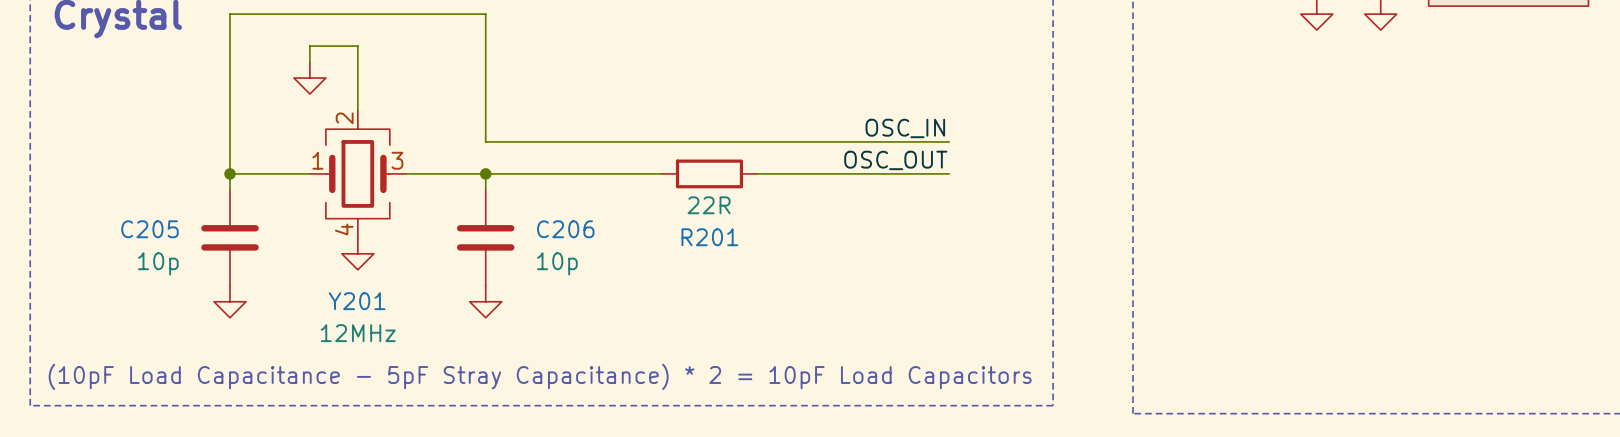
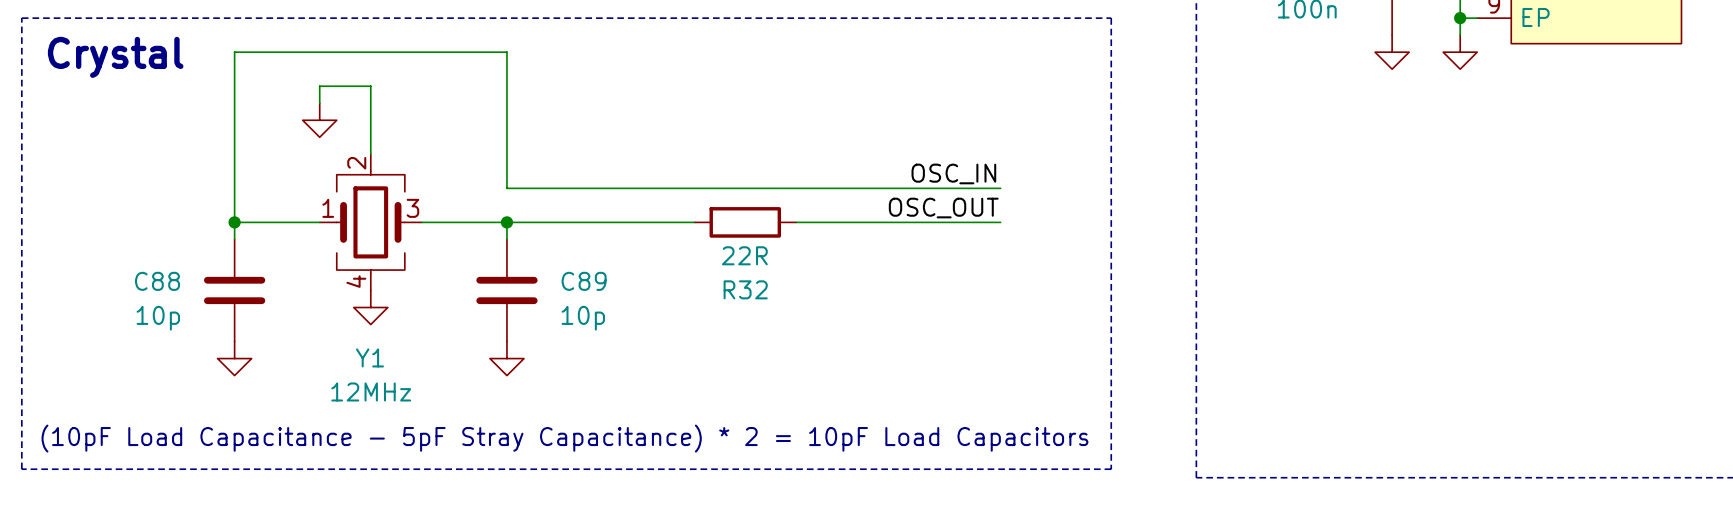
C205 name: C205 (149, 229) -> C88 (157, 281)
C206 name: C206 (565, 229) -> C89 (584, 281)
R201 name: R201 (709, 237) -> R32 (745, 289)
Y201 name: Y201 (357, 301) -> Y1 (369, 357)

